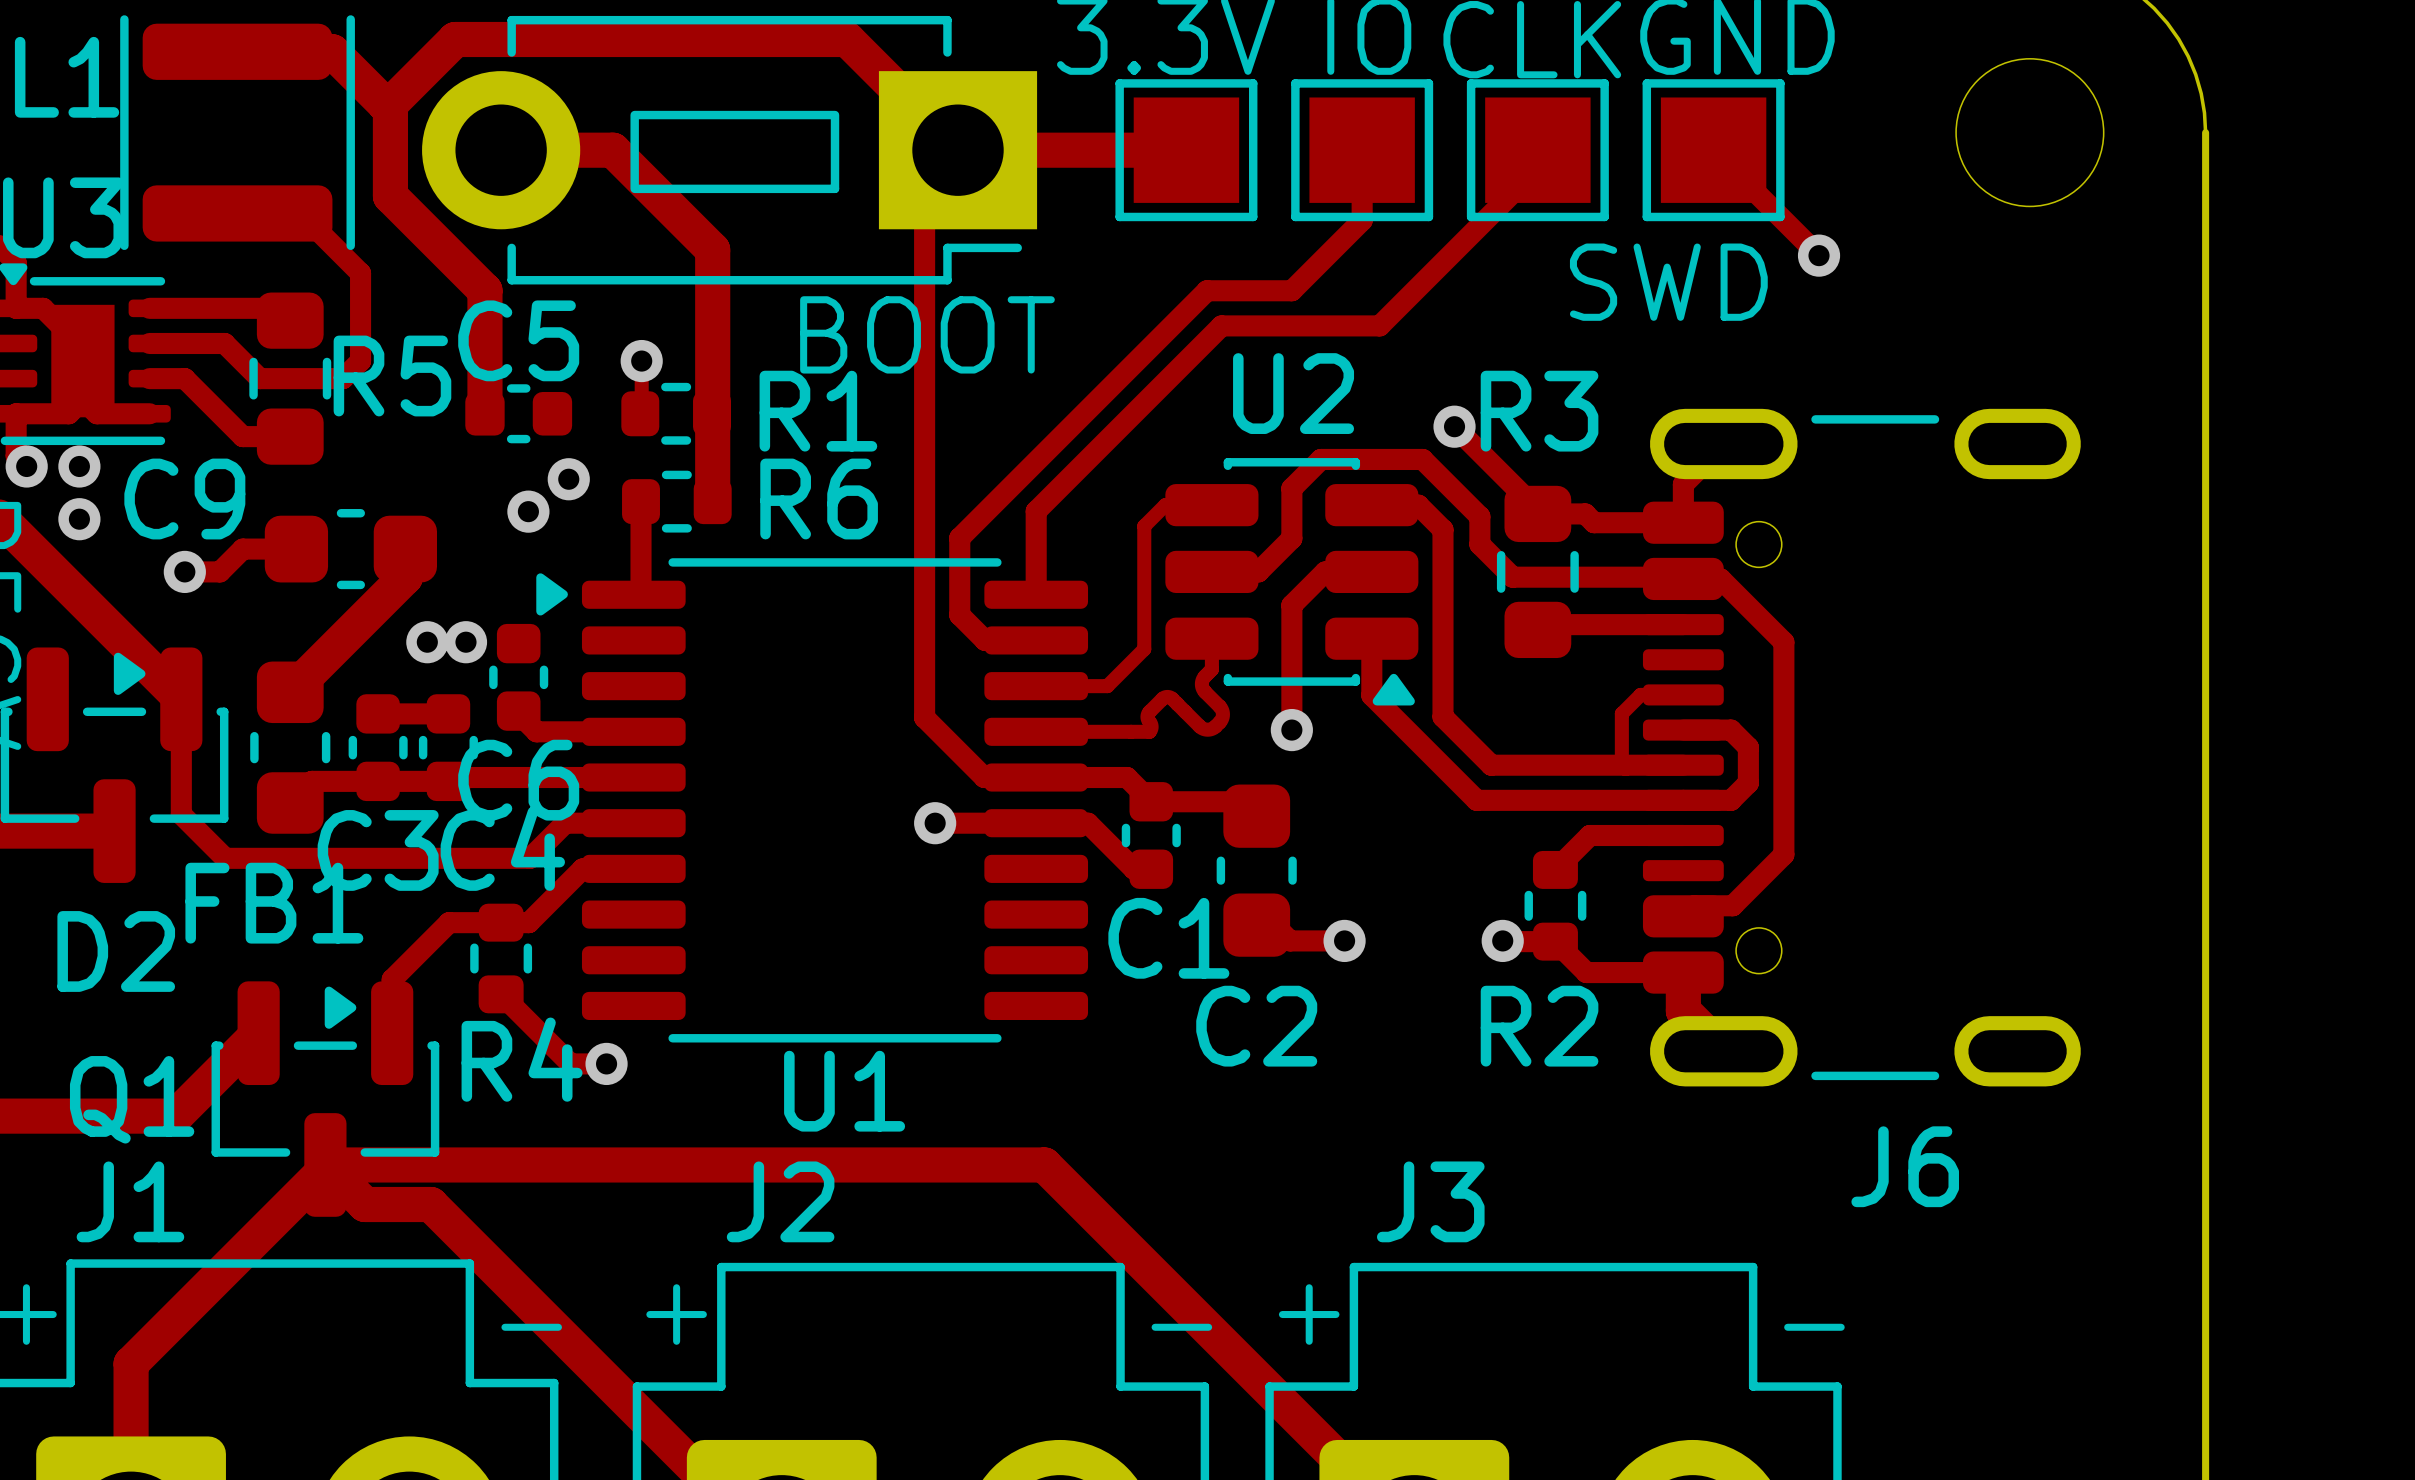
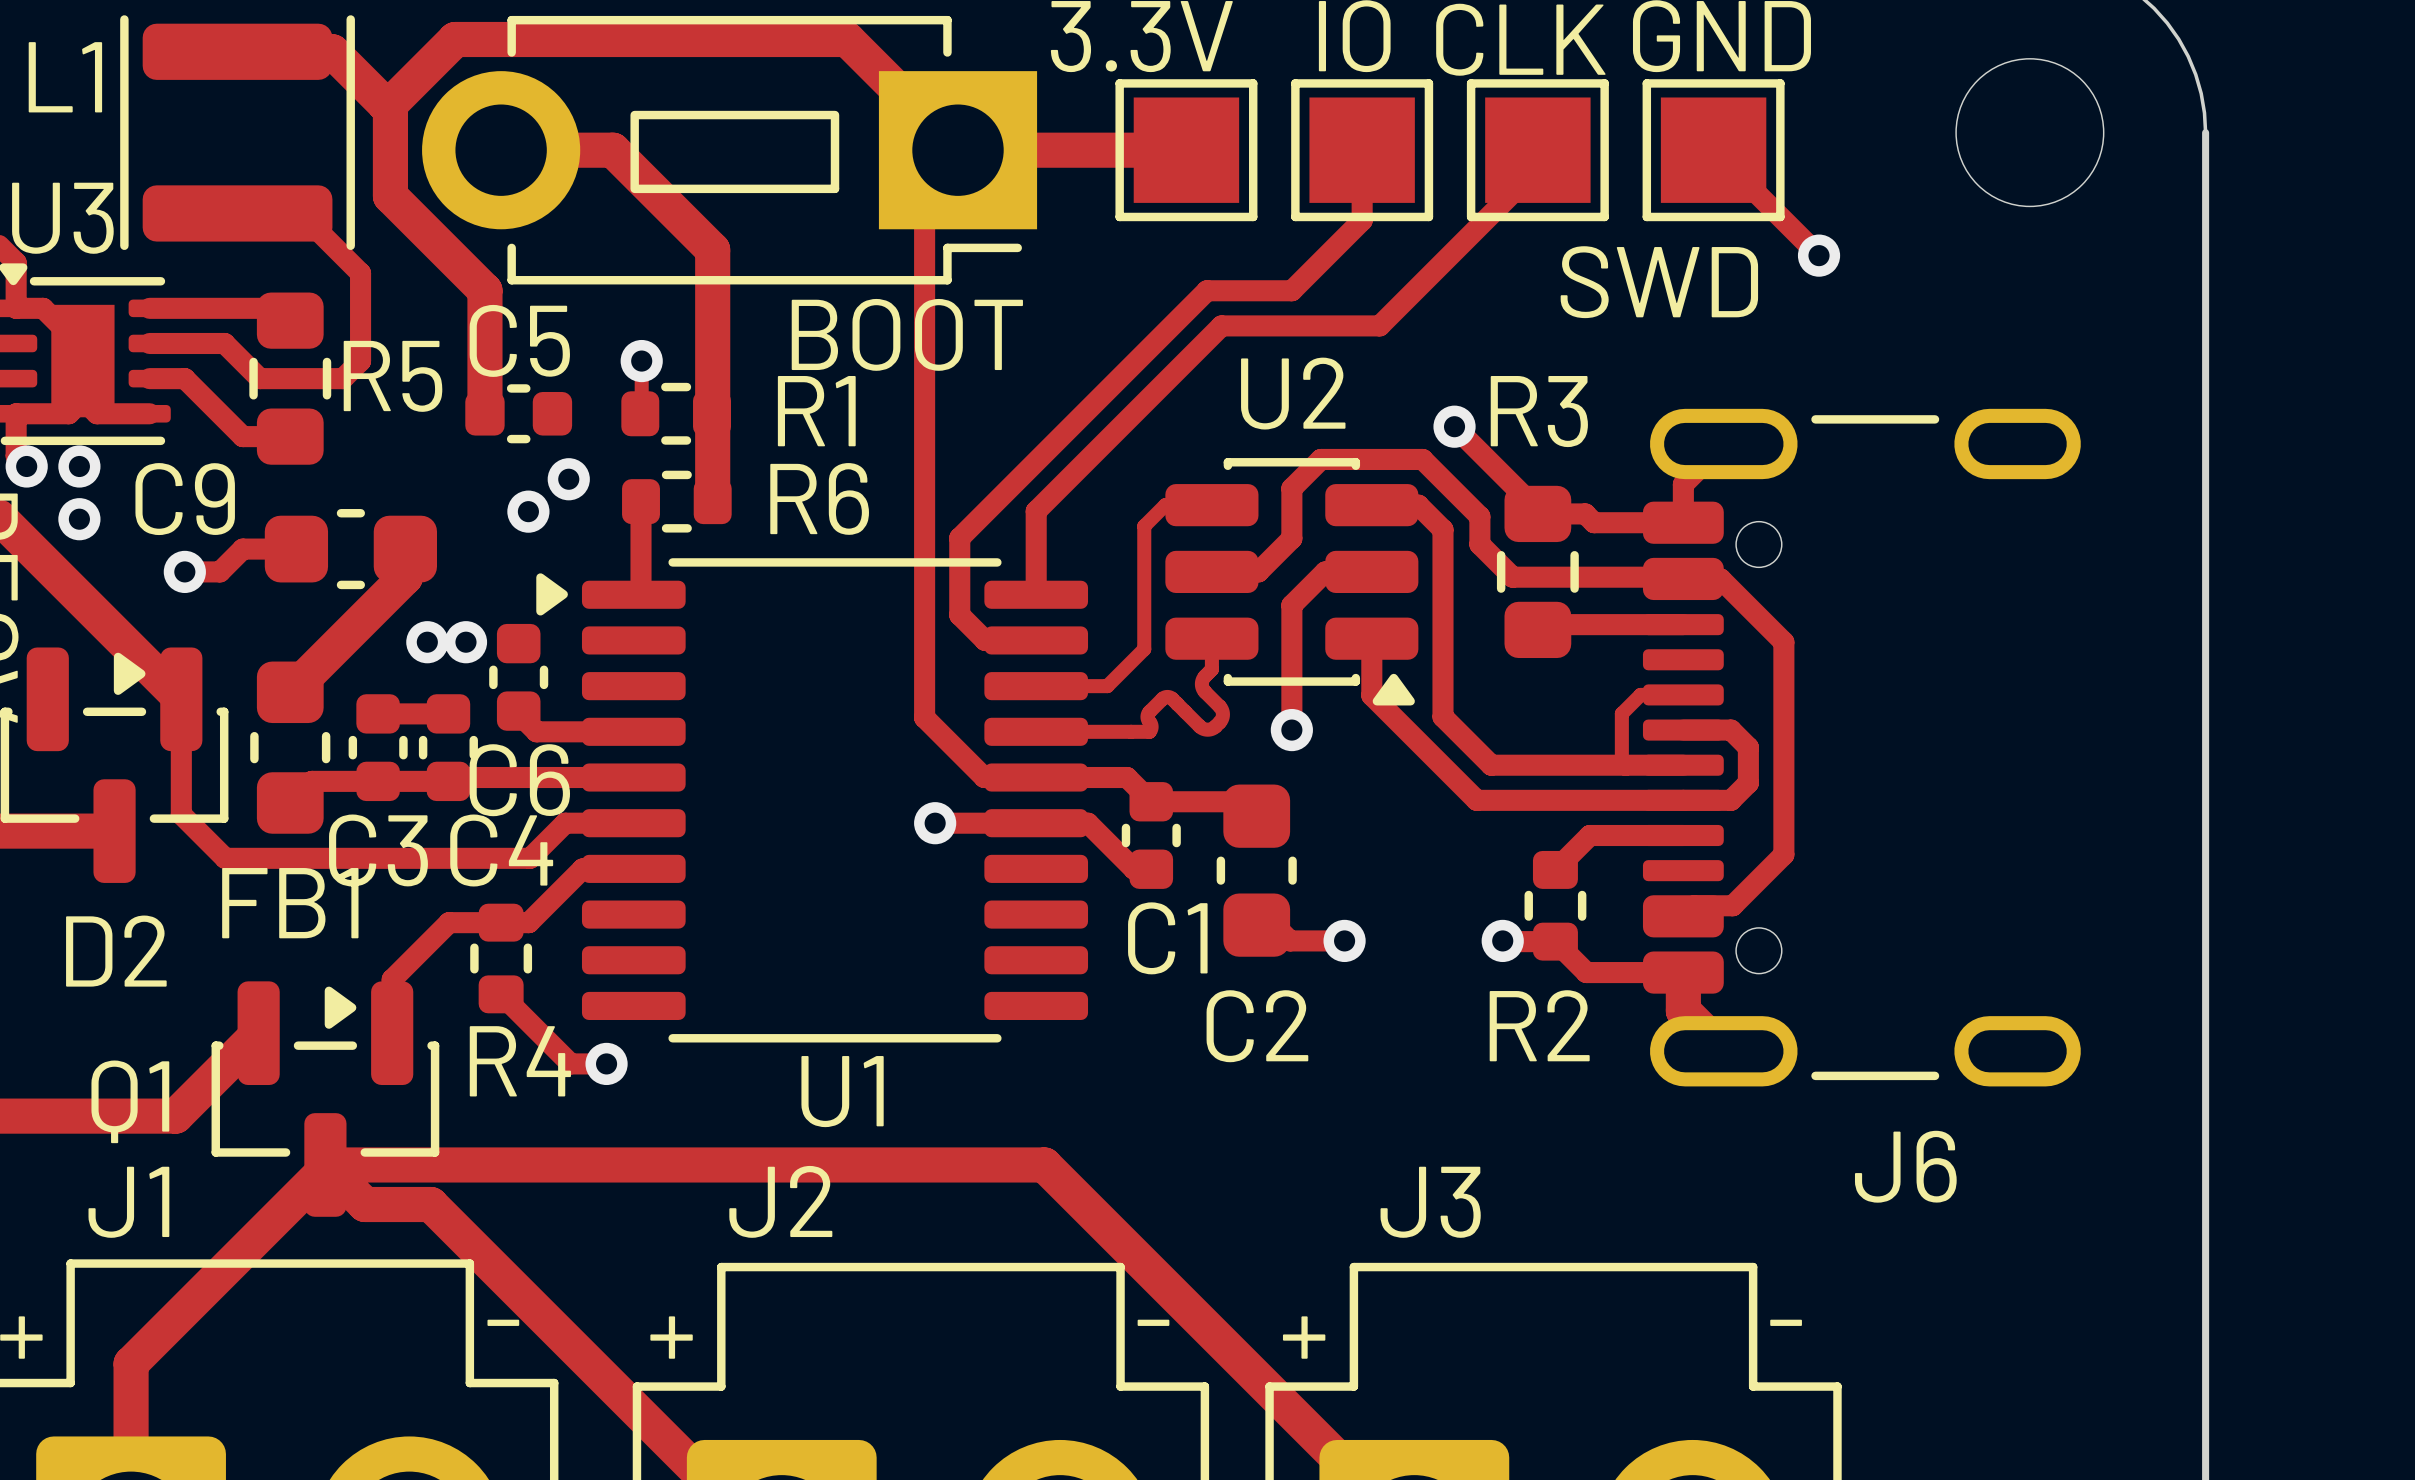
FB1 name position: FB1 (274, 903) -> FB1 (290, 903)

